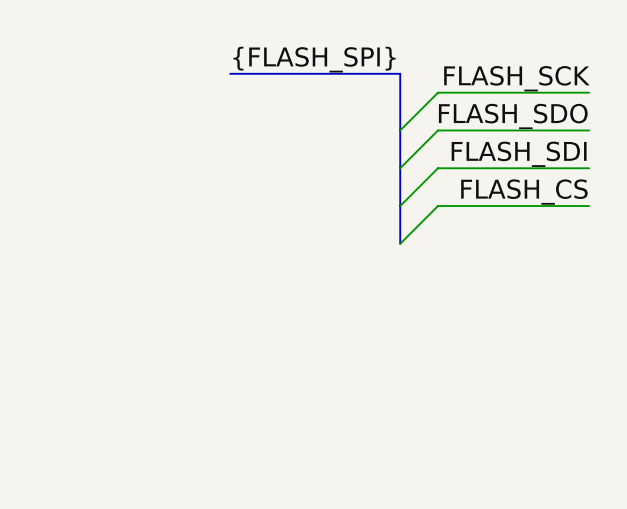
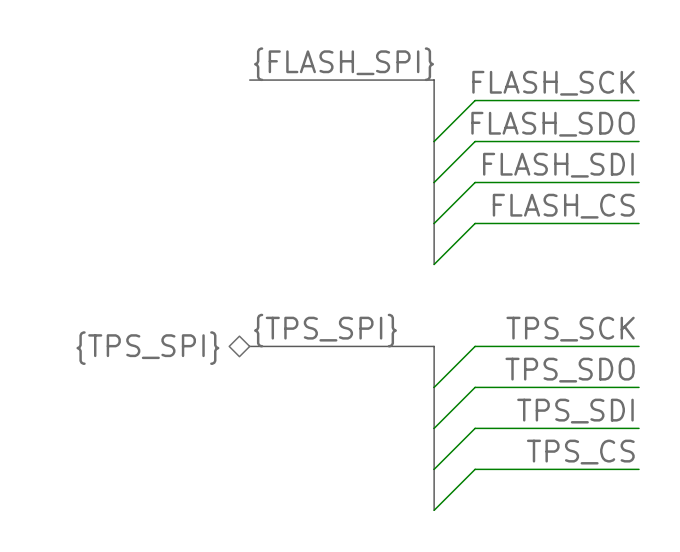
label: none -> {TPS_SPI} (325, 330)
label: none -> TPS_SCK (570, 329)
bus: none -> (249, 346) (434, 346) (434, 510)
wire: none -> (639, 346) (475, 346) (434, 387)
hierarchical label: none -> {TPS_SPI} (147, 348)
label: none -> TPS_SDO (570, 370)
wire: none -> (639, 387) (475, 387) (434, 428)
label: none -> TPS_SDI (575, 411)
wire: none -> (639, 428) (475, 428) (434, 469)
label: none -> TPS_CS (580, 452)
wire: none -> (639, 469) (475, 469) (434, 510)

